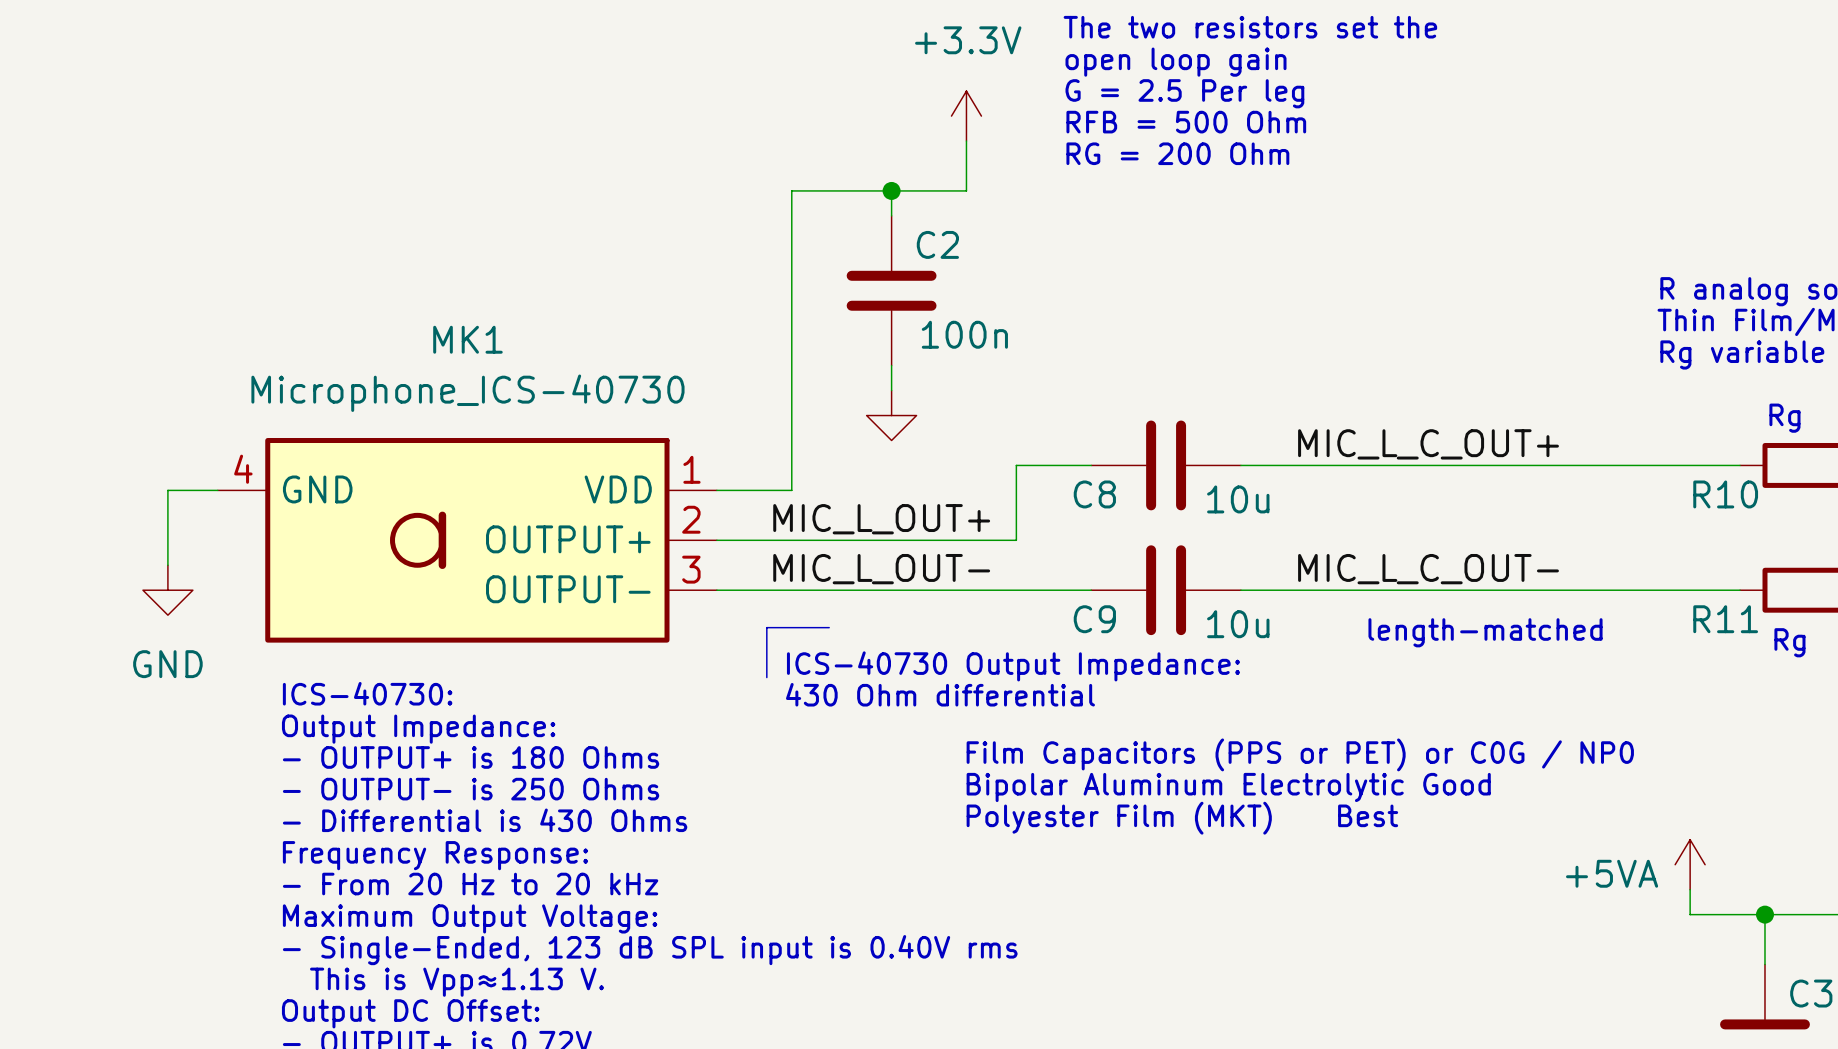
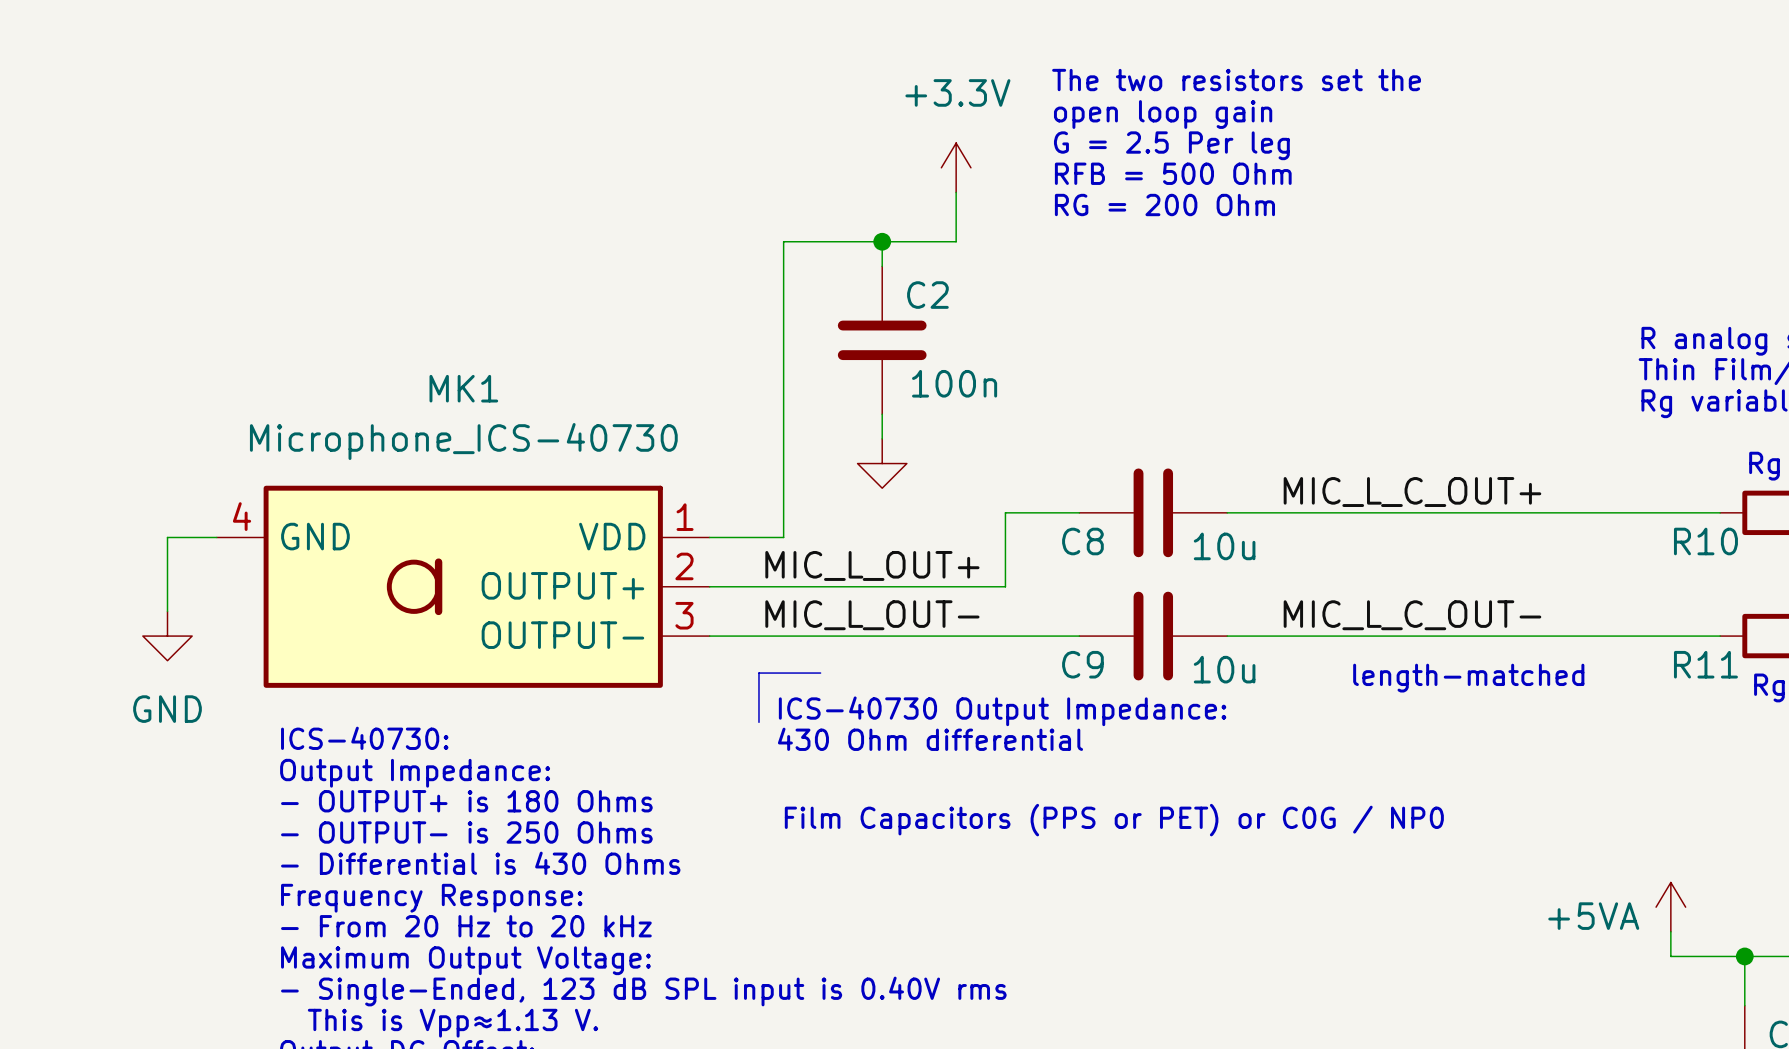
text position: Film Capacitors (PPS or PET) or C0G / NP0 (1300, 754) -> Film Capacitors (PPS or PET) or C0G / NP0 (1114, 820)
text: Bipolar Aluminum Electrolytic Good (1228, 787) -> none
text: Polyester Film (MKT) Best (1182, 818) -> none

